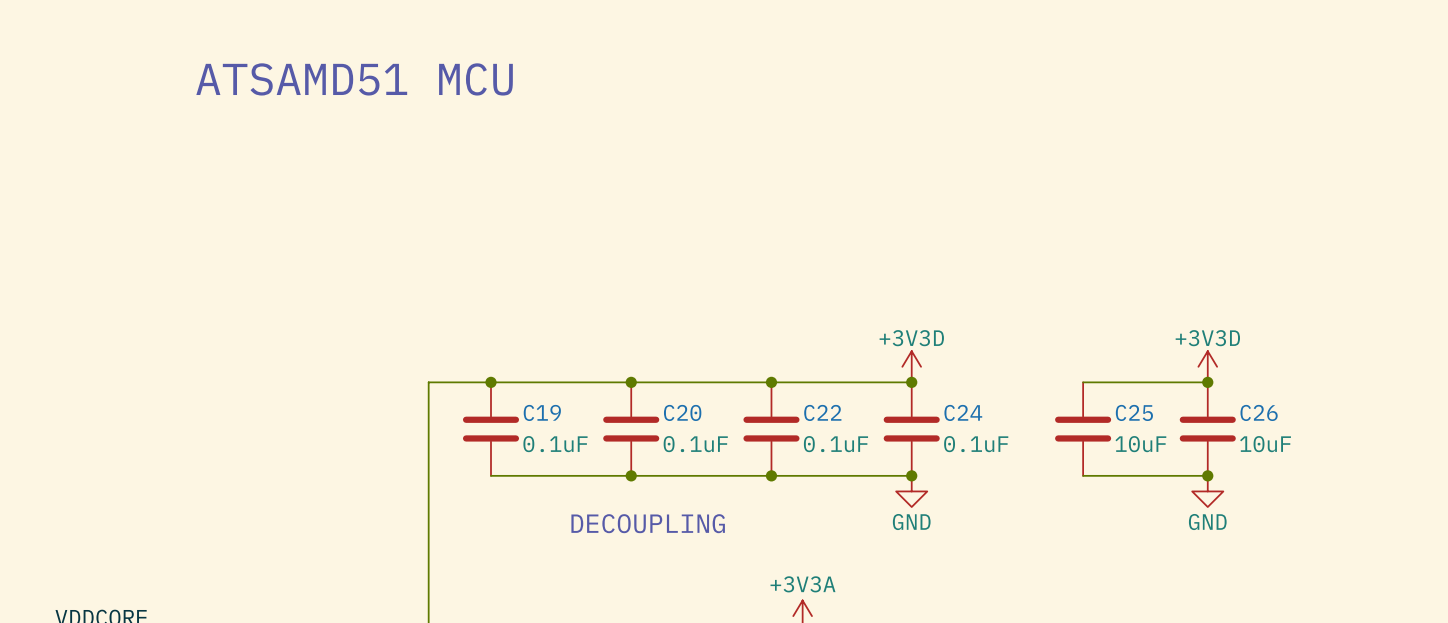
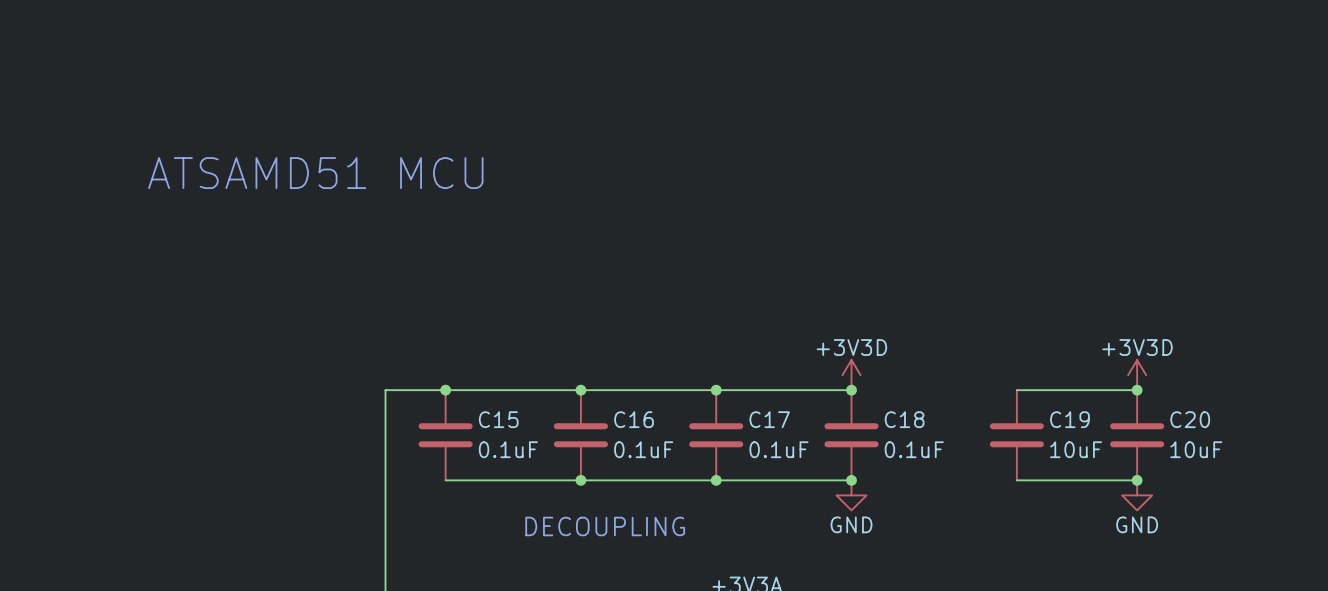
text position: ATSAMD51 MCU (354, 79) -> ATSAMD51 MCU (315, 173)
C19 name: C19 (542, 412) -> C15 (498, 419)
C20 name: C20 (682, 412) -> C16 (634, 419)
C22 name: C22 (822, 412) -> C17 (769, 419)
C24 name: C24 (963, 412) -> C18 (904, 419)
C25 name: C25 (1134, 412) -> C19 (1069, 419)
C26 name: C26 (1259, 412) -> C20 (1190, 419)

